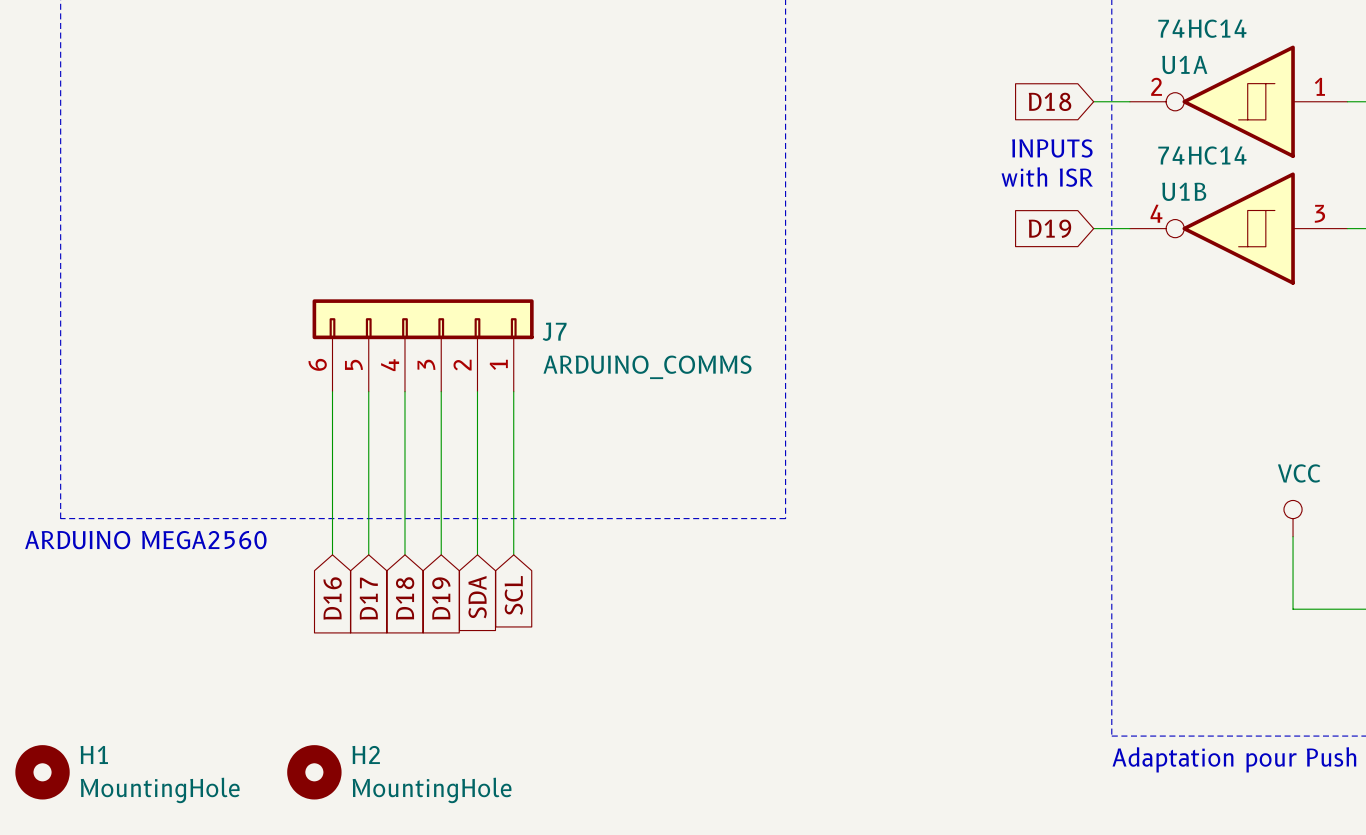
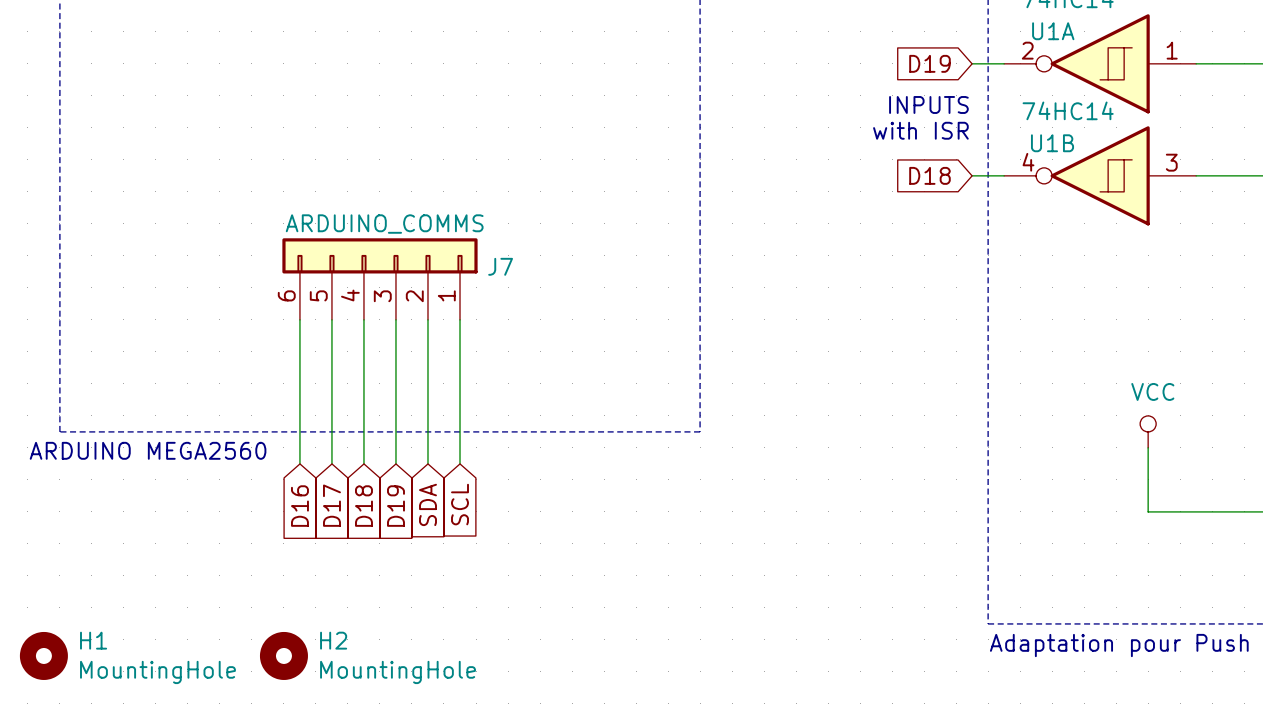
global label: D18 (1050, 101) -> D19 (929, 63)
global label: D19 (1049, 228) -> D18 (929, 175)
J7 value position: ARDUINO_COMMS (647, 367) -> ARDUINO_COMMS (384, 224)

